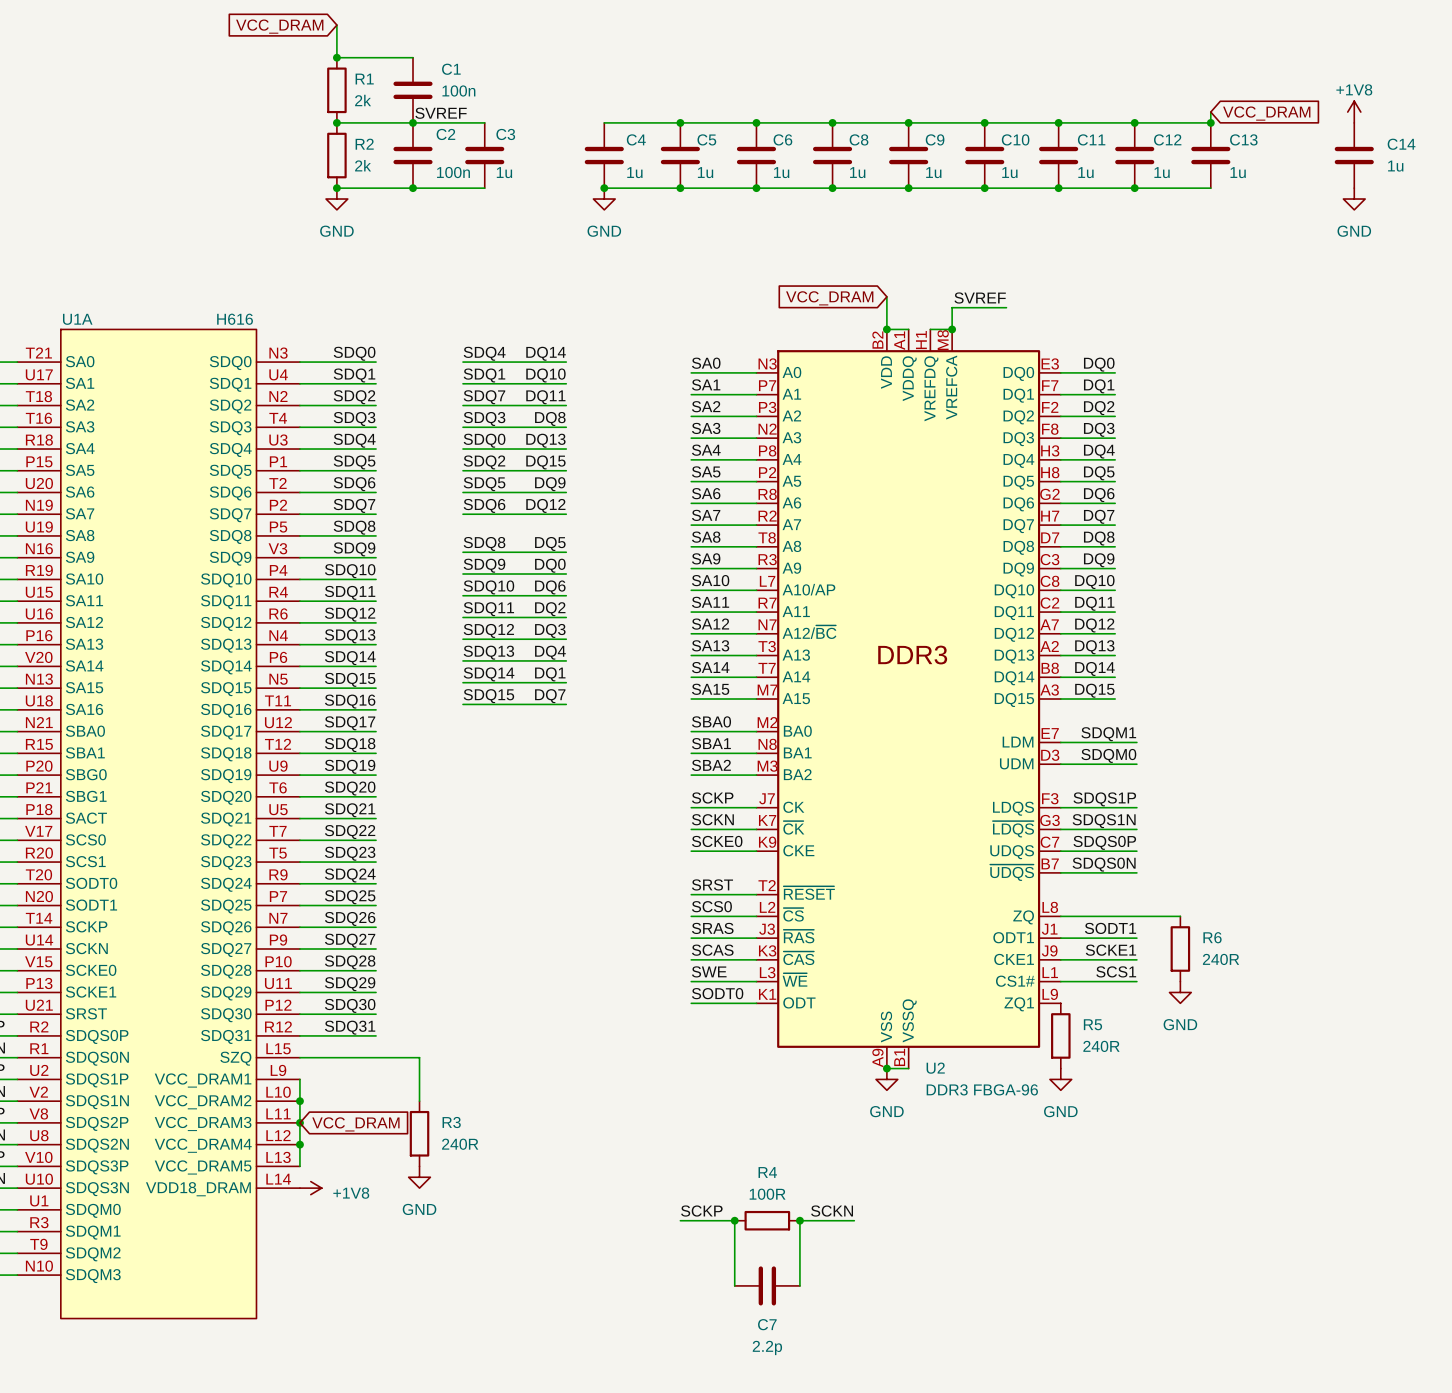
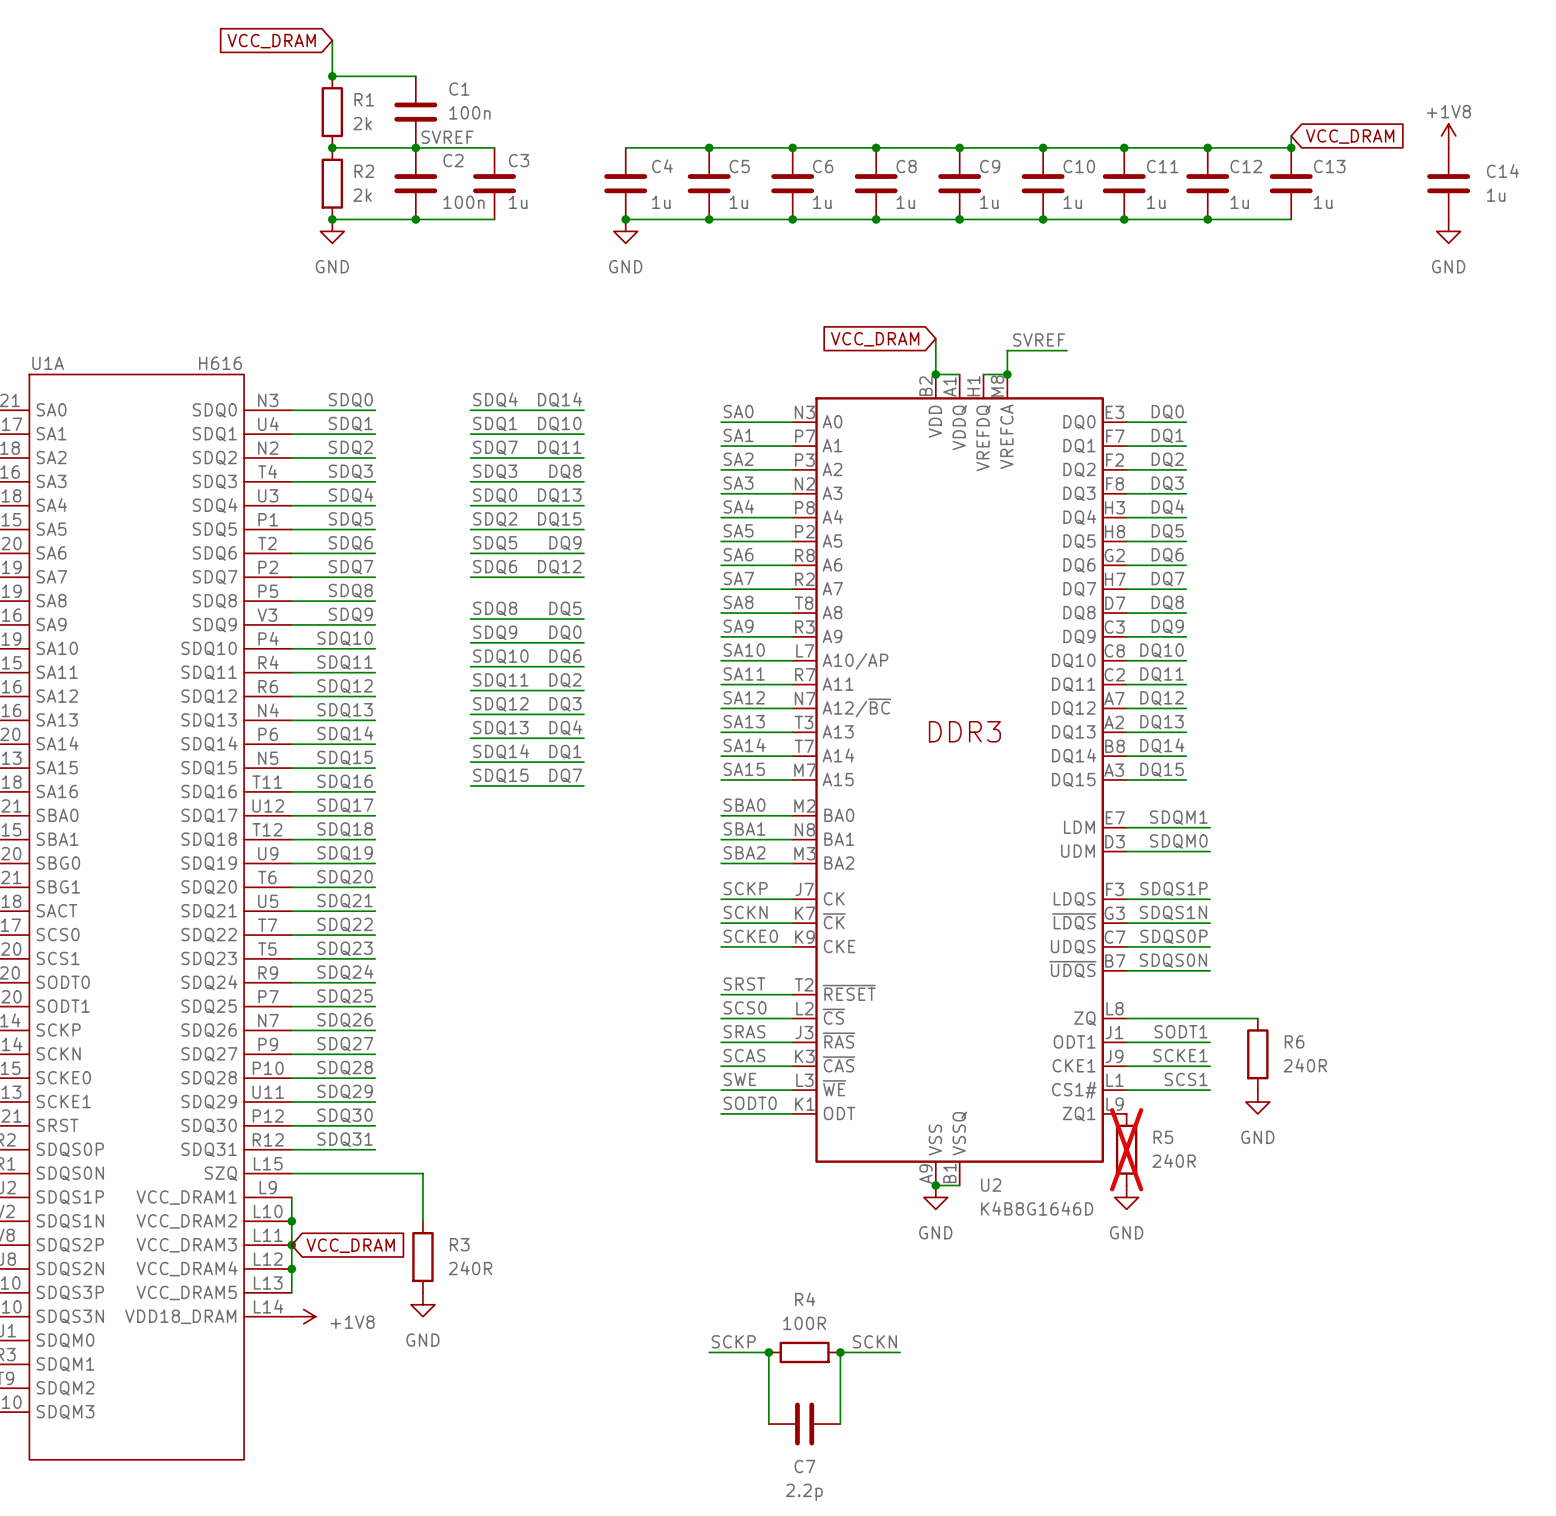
R5 do-not-place cross: none -> (1126, 1149)
U2 value: DDR3 FBGA-96 (982, 1089) -> K4B8G1646D (1037, 1208)

